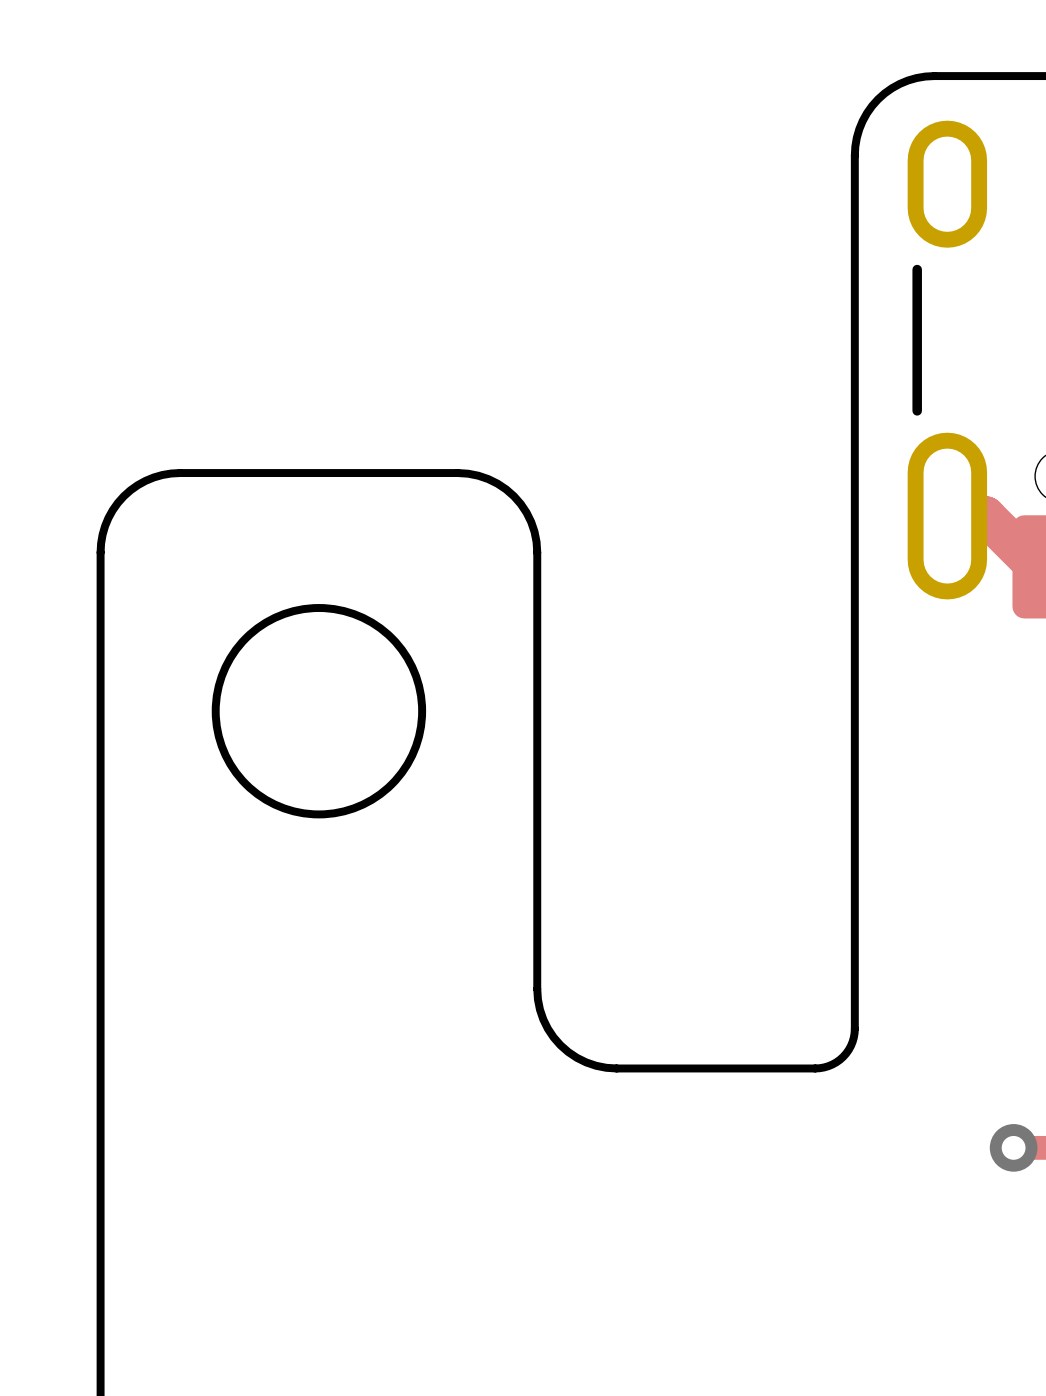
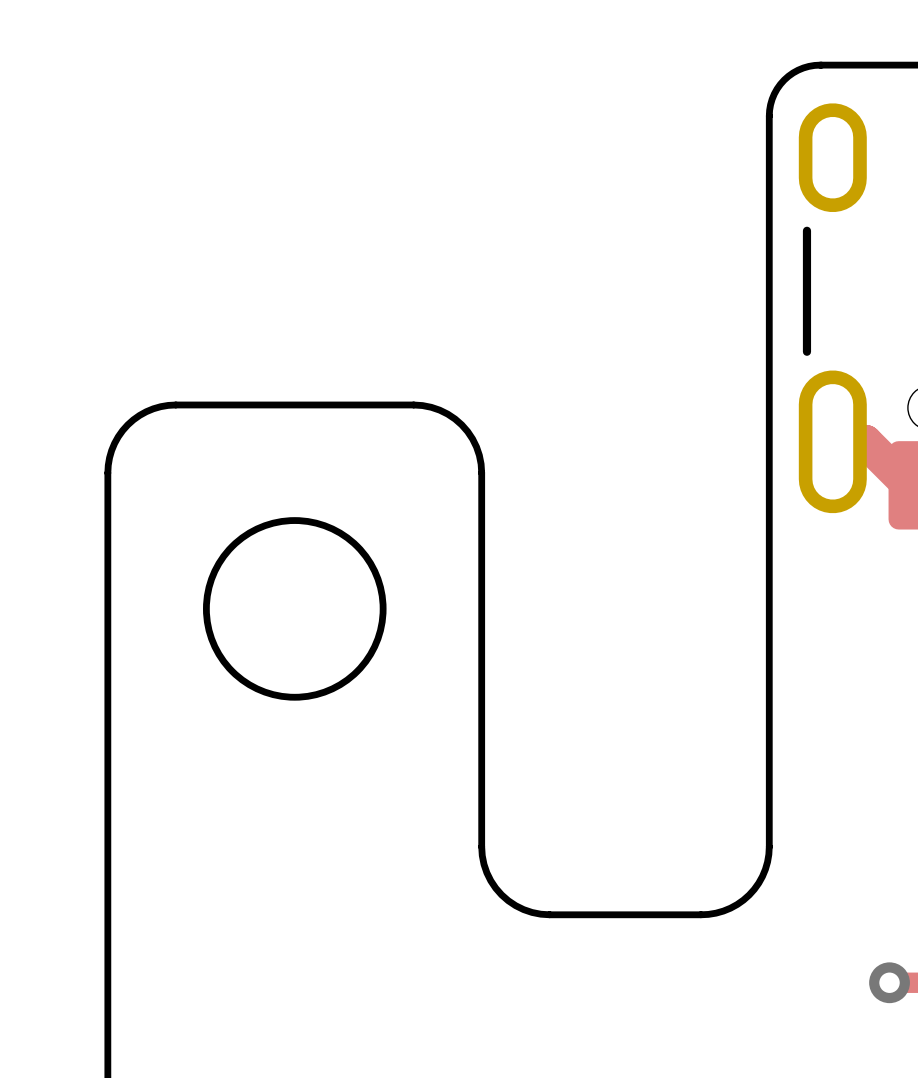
board edge: (934, 76) (916, 78) (899, 83) (878, 99) (862, 121) (855, 146) (854, 1033) (848, 1049) (836, 1062) (819, 1068) (793, 1068) -> (820, 65) (803, 67) (788, 76) (777, 88) (769, 110) (768, 854) (762, 876) (749, 895) (730, 908) (716, 913) (700, 914)

